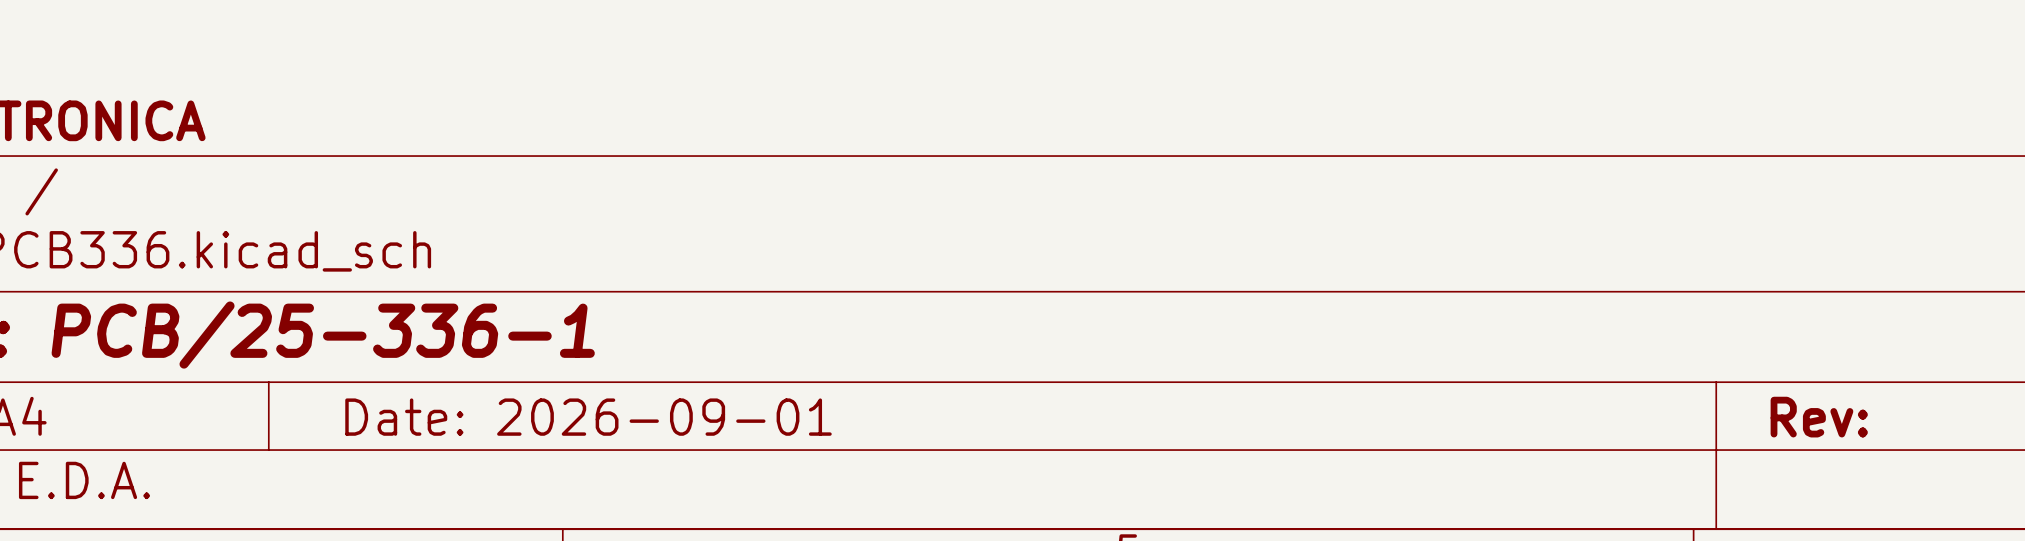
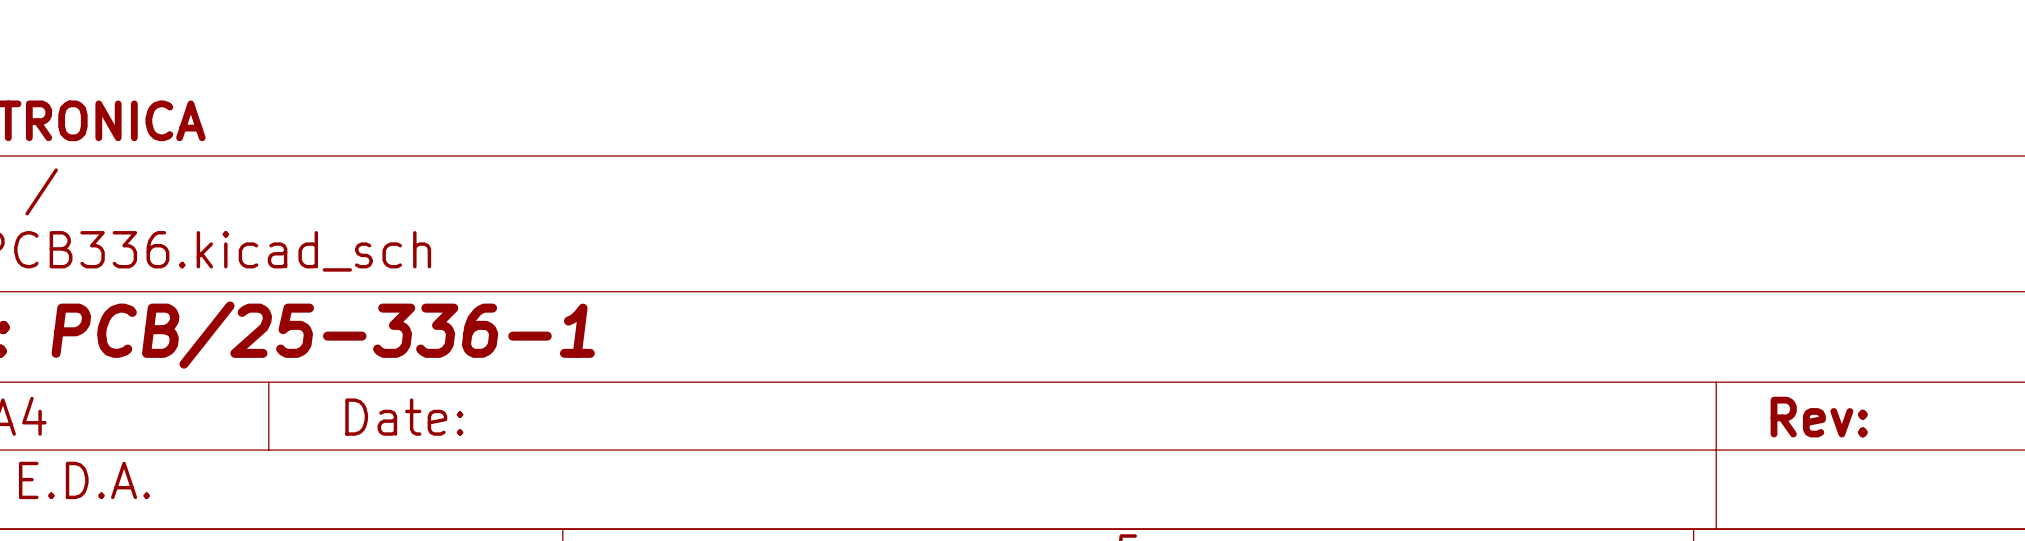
title block: Date: 2026-09-01 (588, 417) -> Date: (404, 417)

